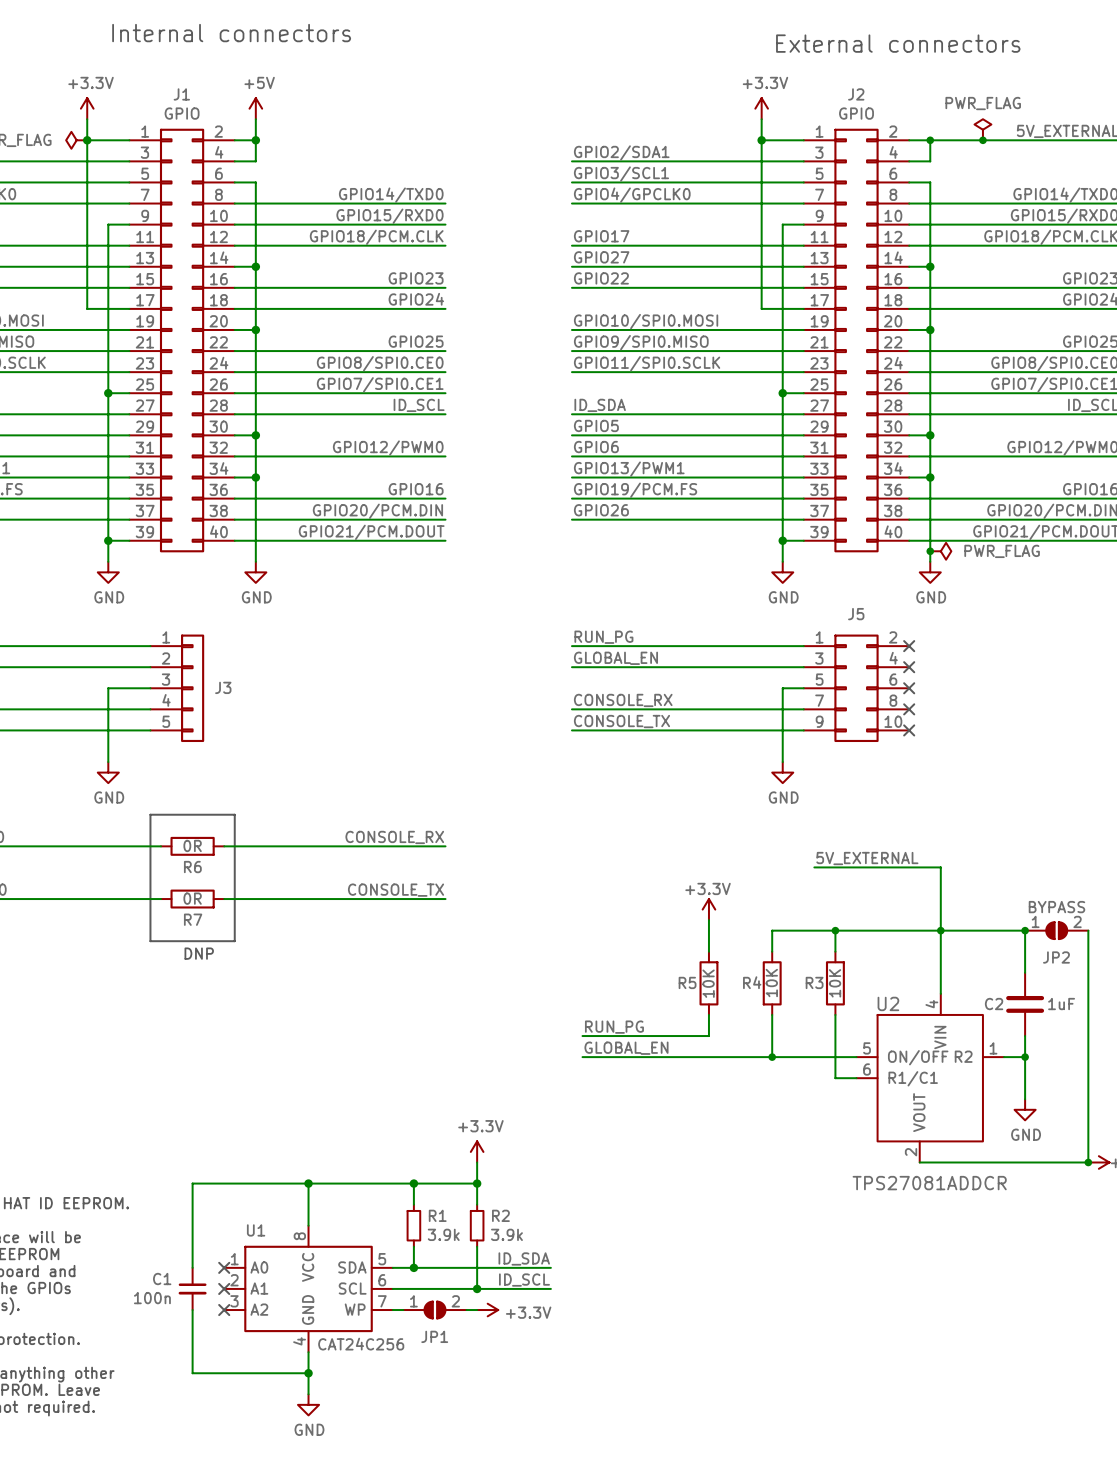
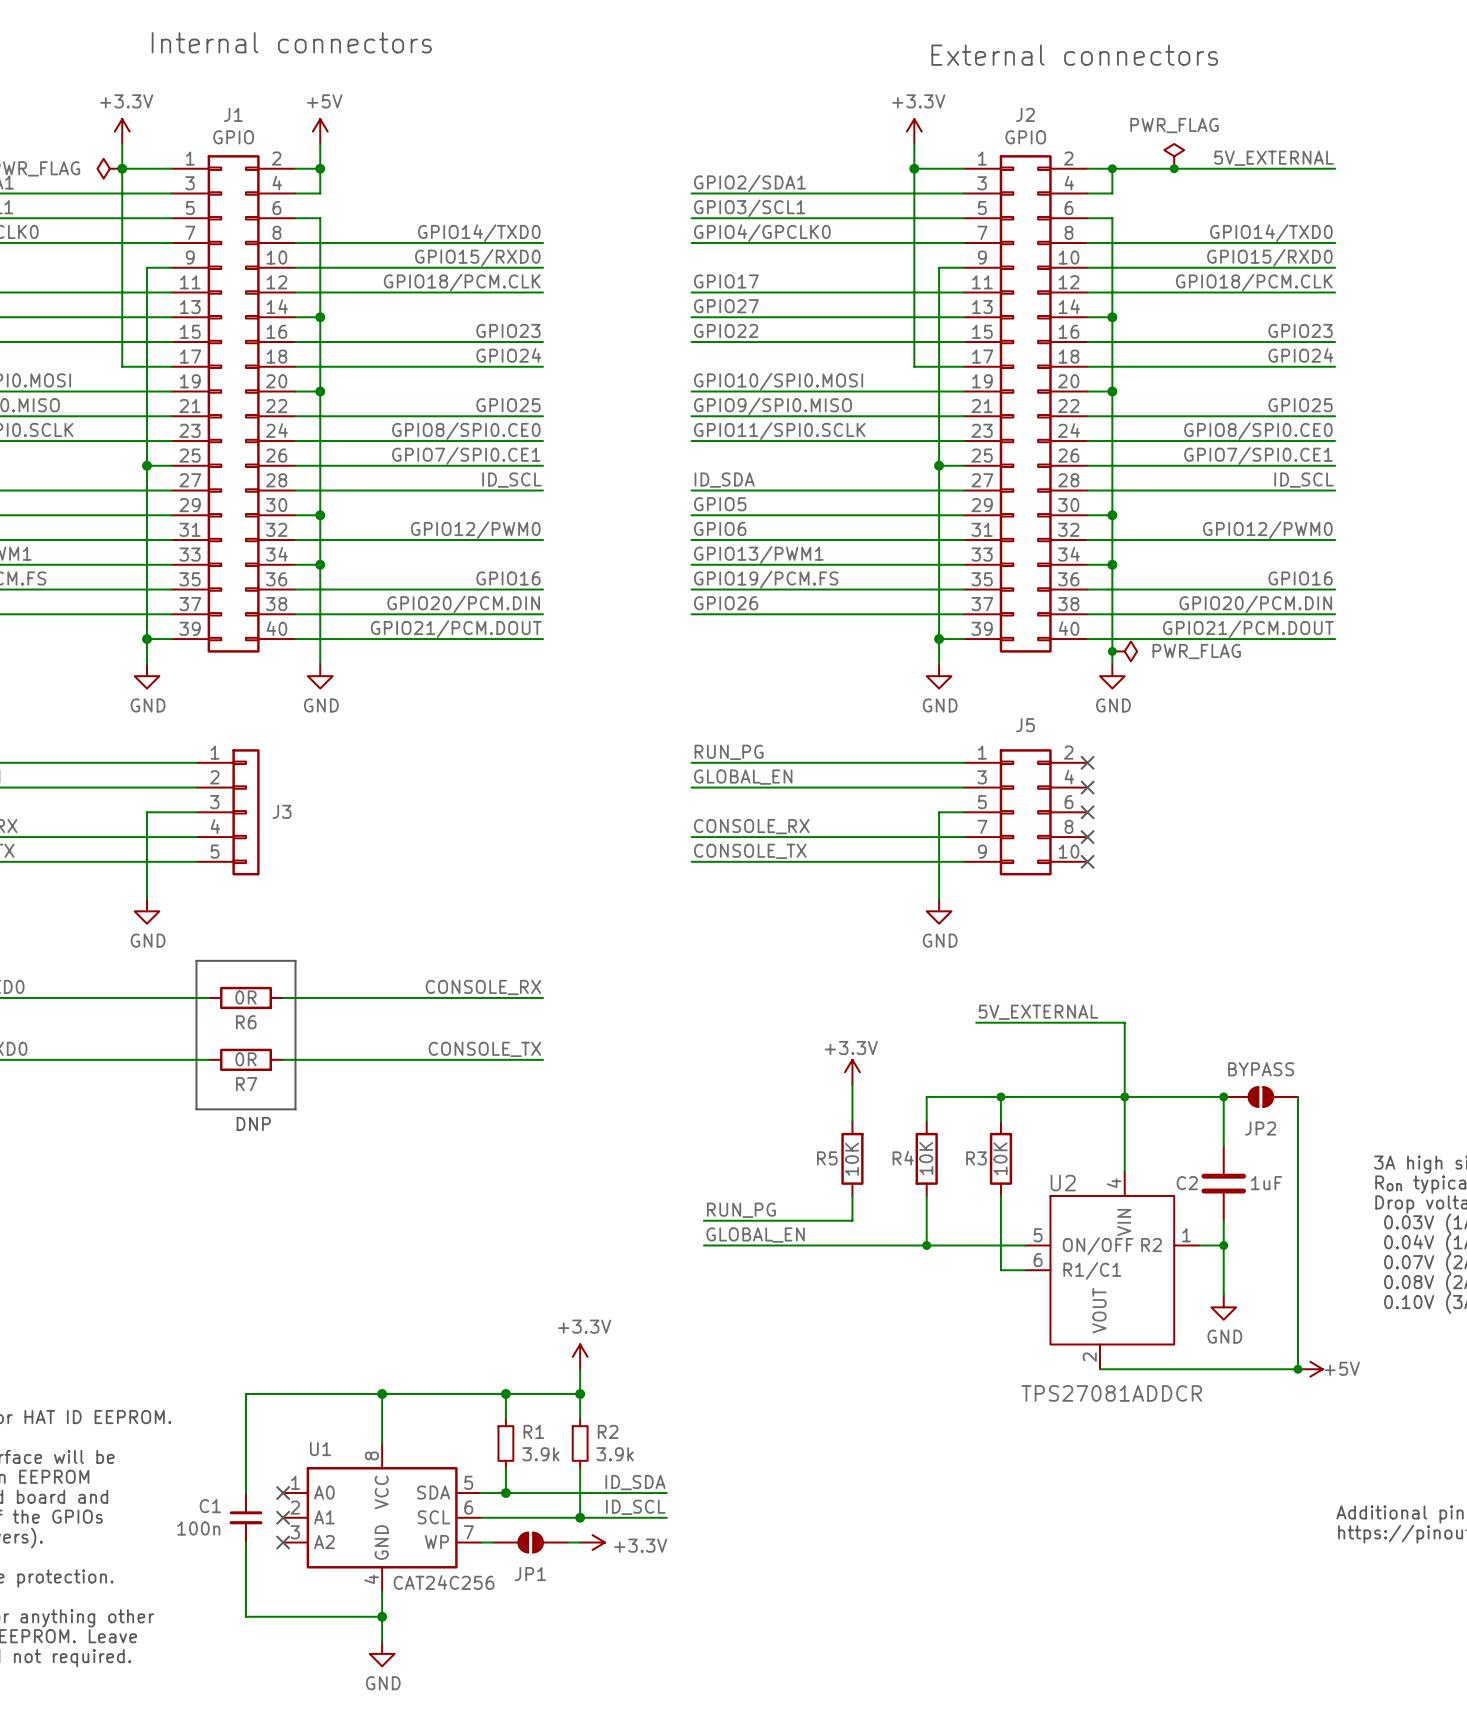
JP2 pin number: 1 (1035, 921) -> none
JP2 pin number: 2 (1077, 921) -> none
JP1 pin number: 1 (413, 1301) -> none
JP1 pin number: 2 (455, 1301) -> none

